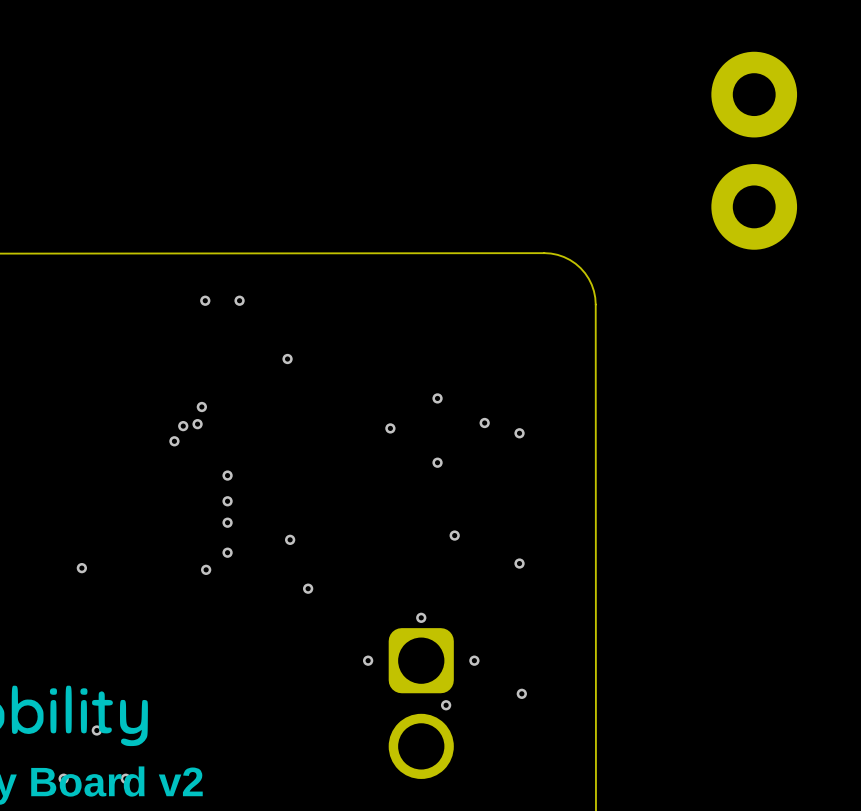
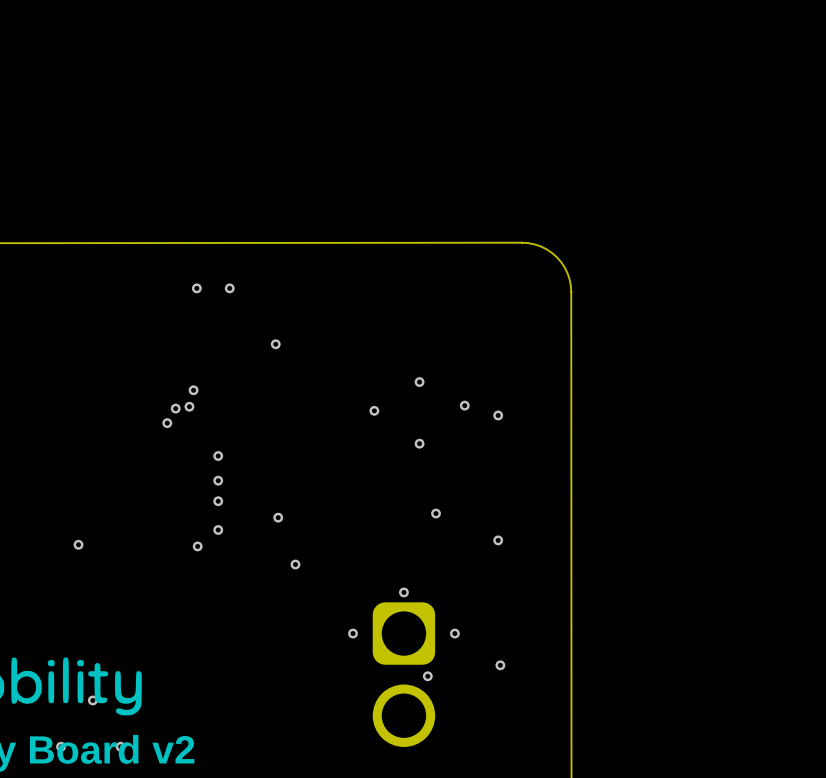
part: (754, 94) -> none
part: (754, 206) -> none

